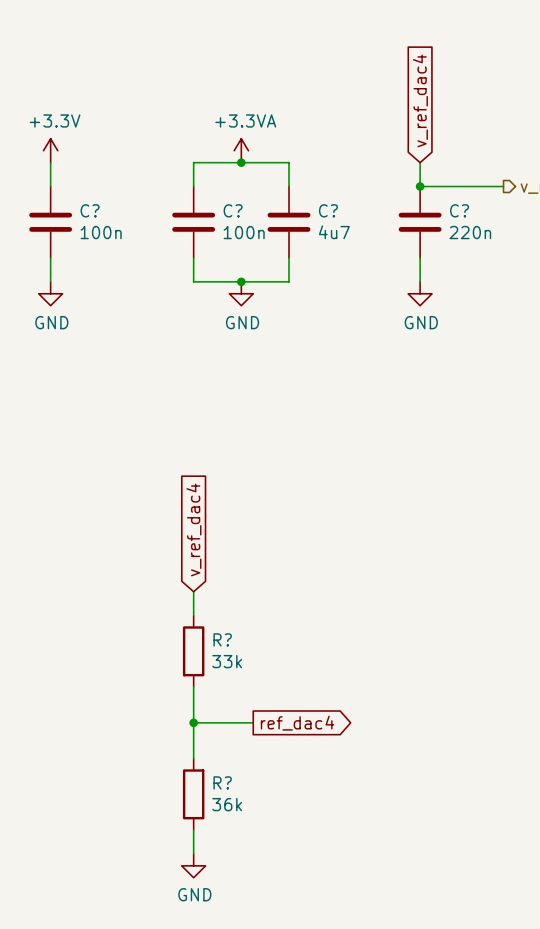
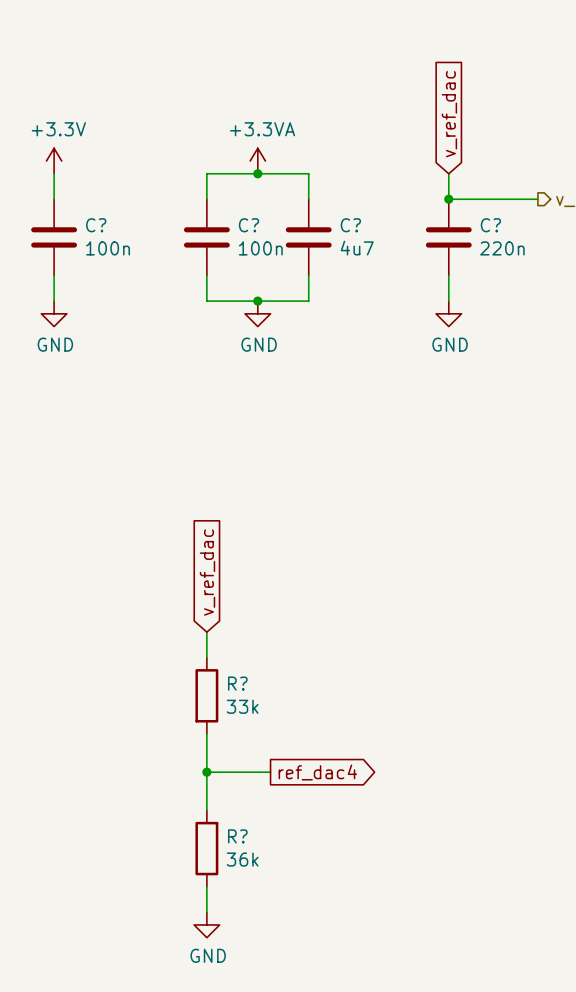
global label: v_ref_dac4 (420, 100) -> v_ref_dac (449, 114)
global label: v_ref_dac4 (193, 530) -> v_ref_dac (207, 572)

